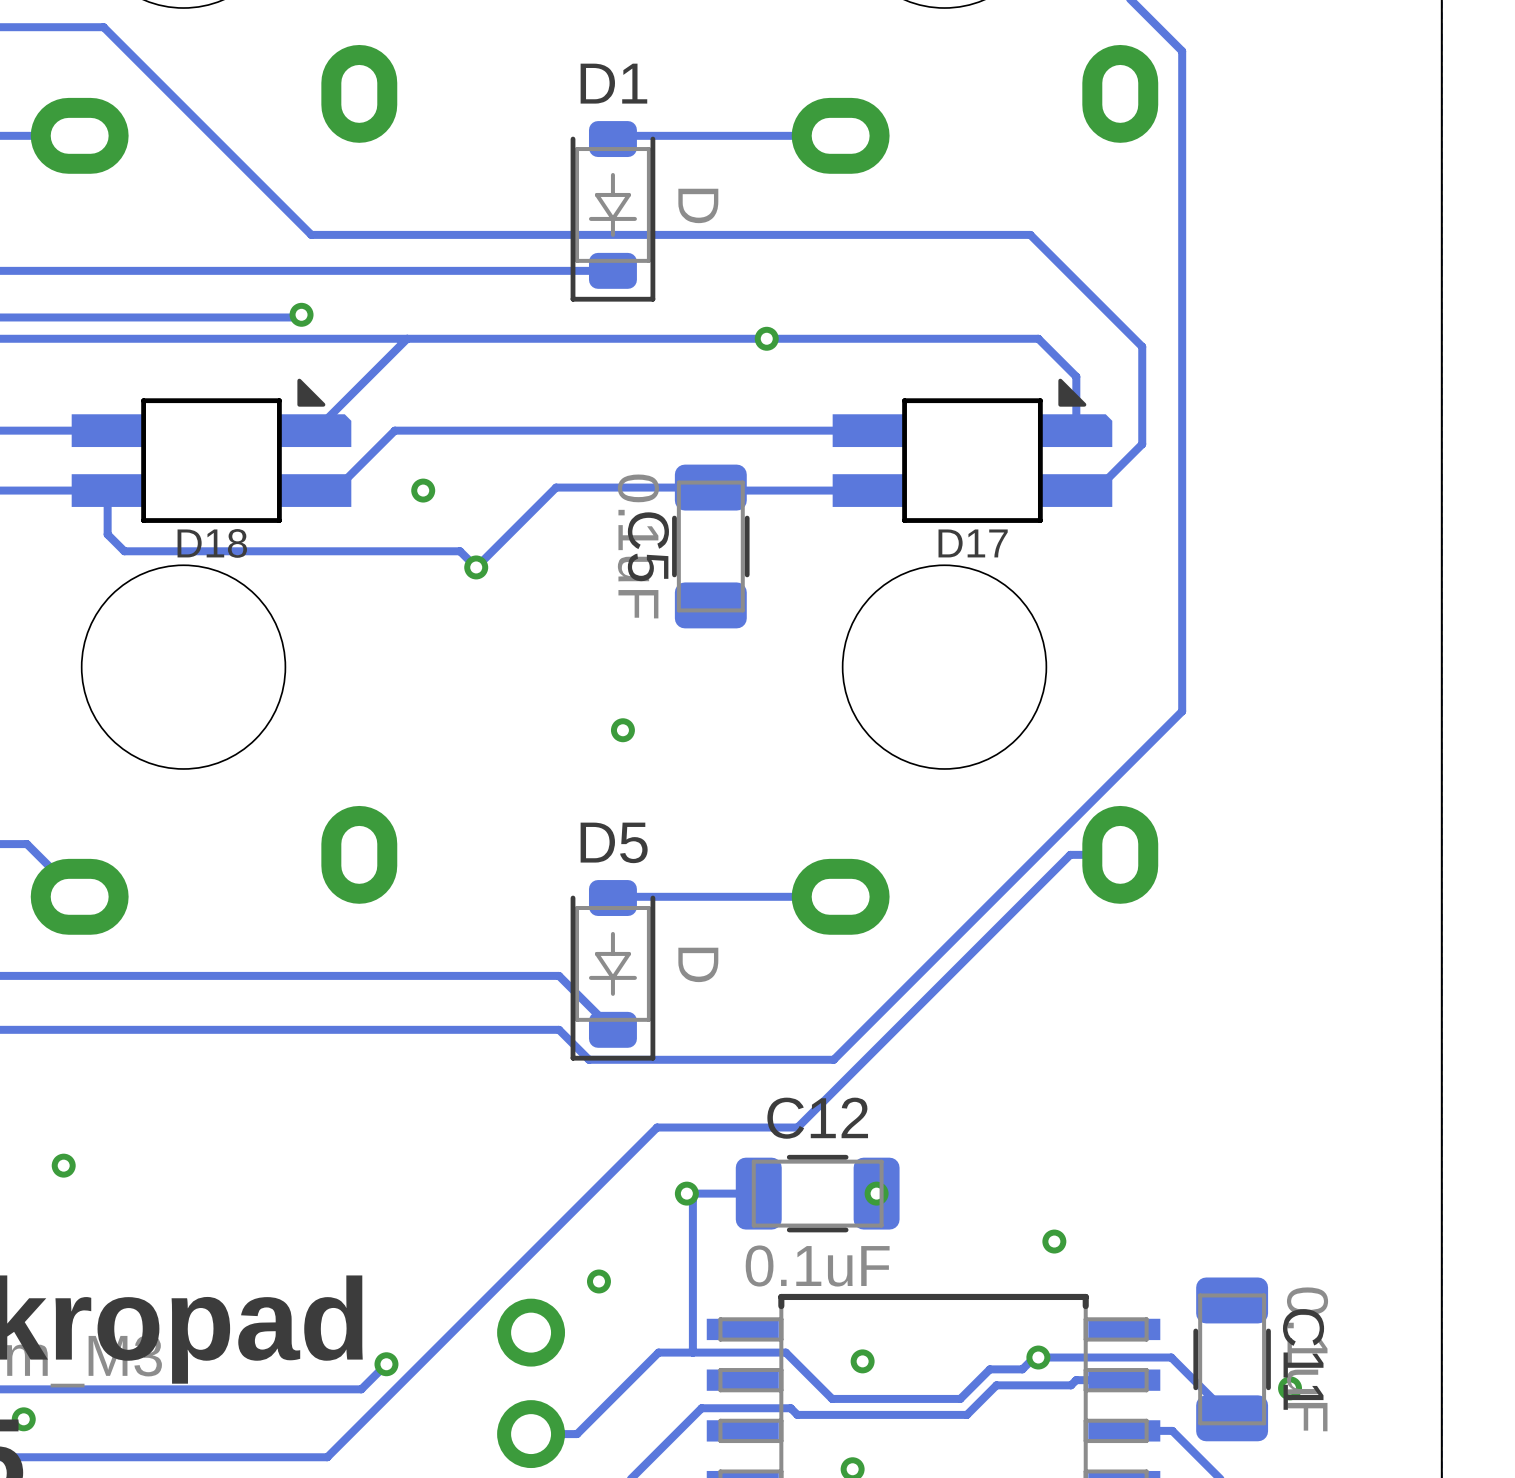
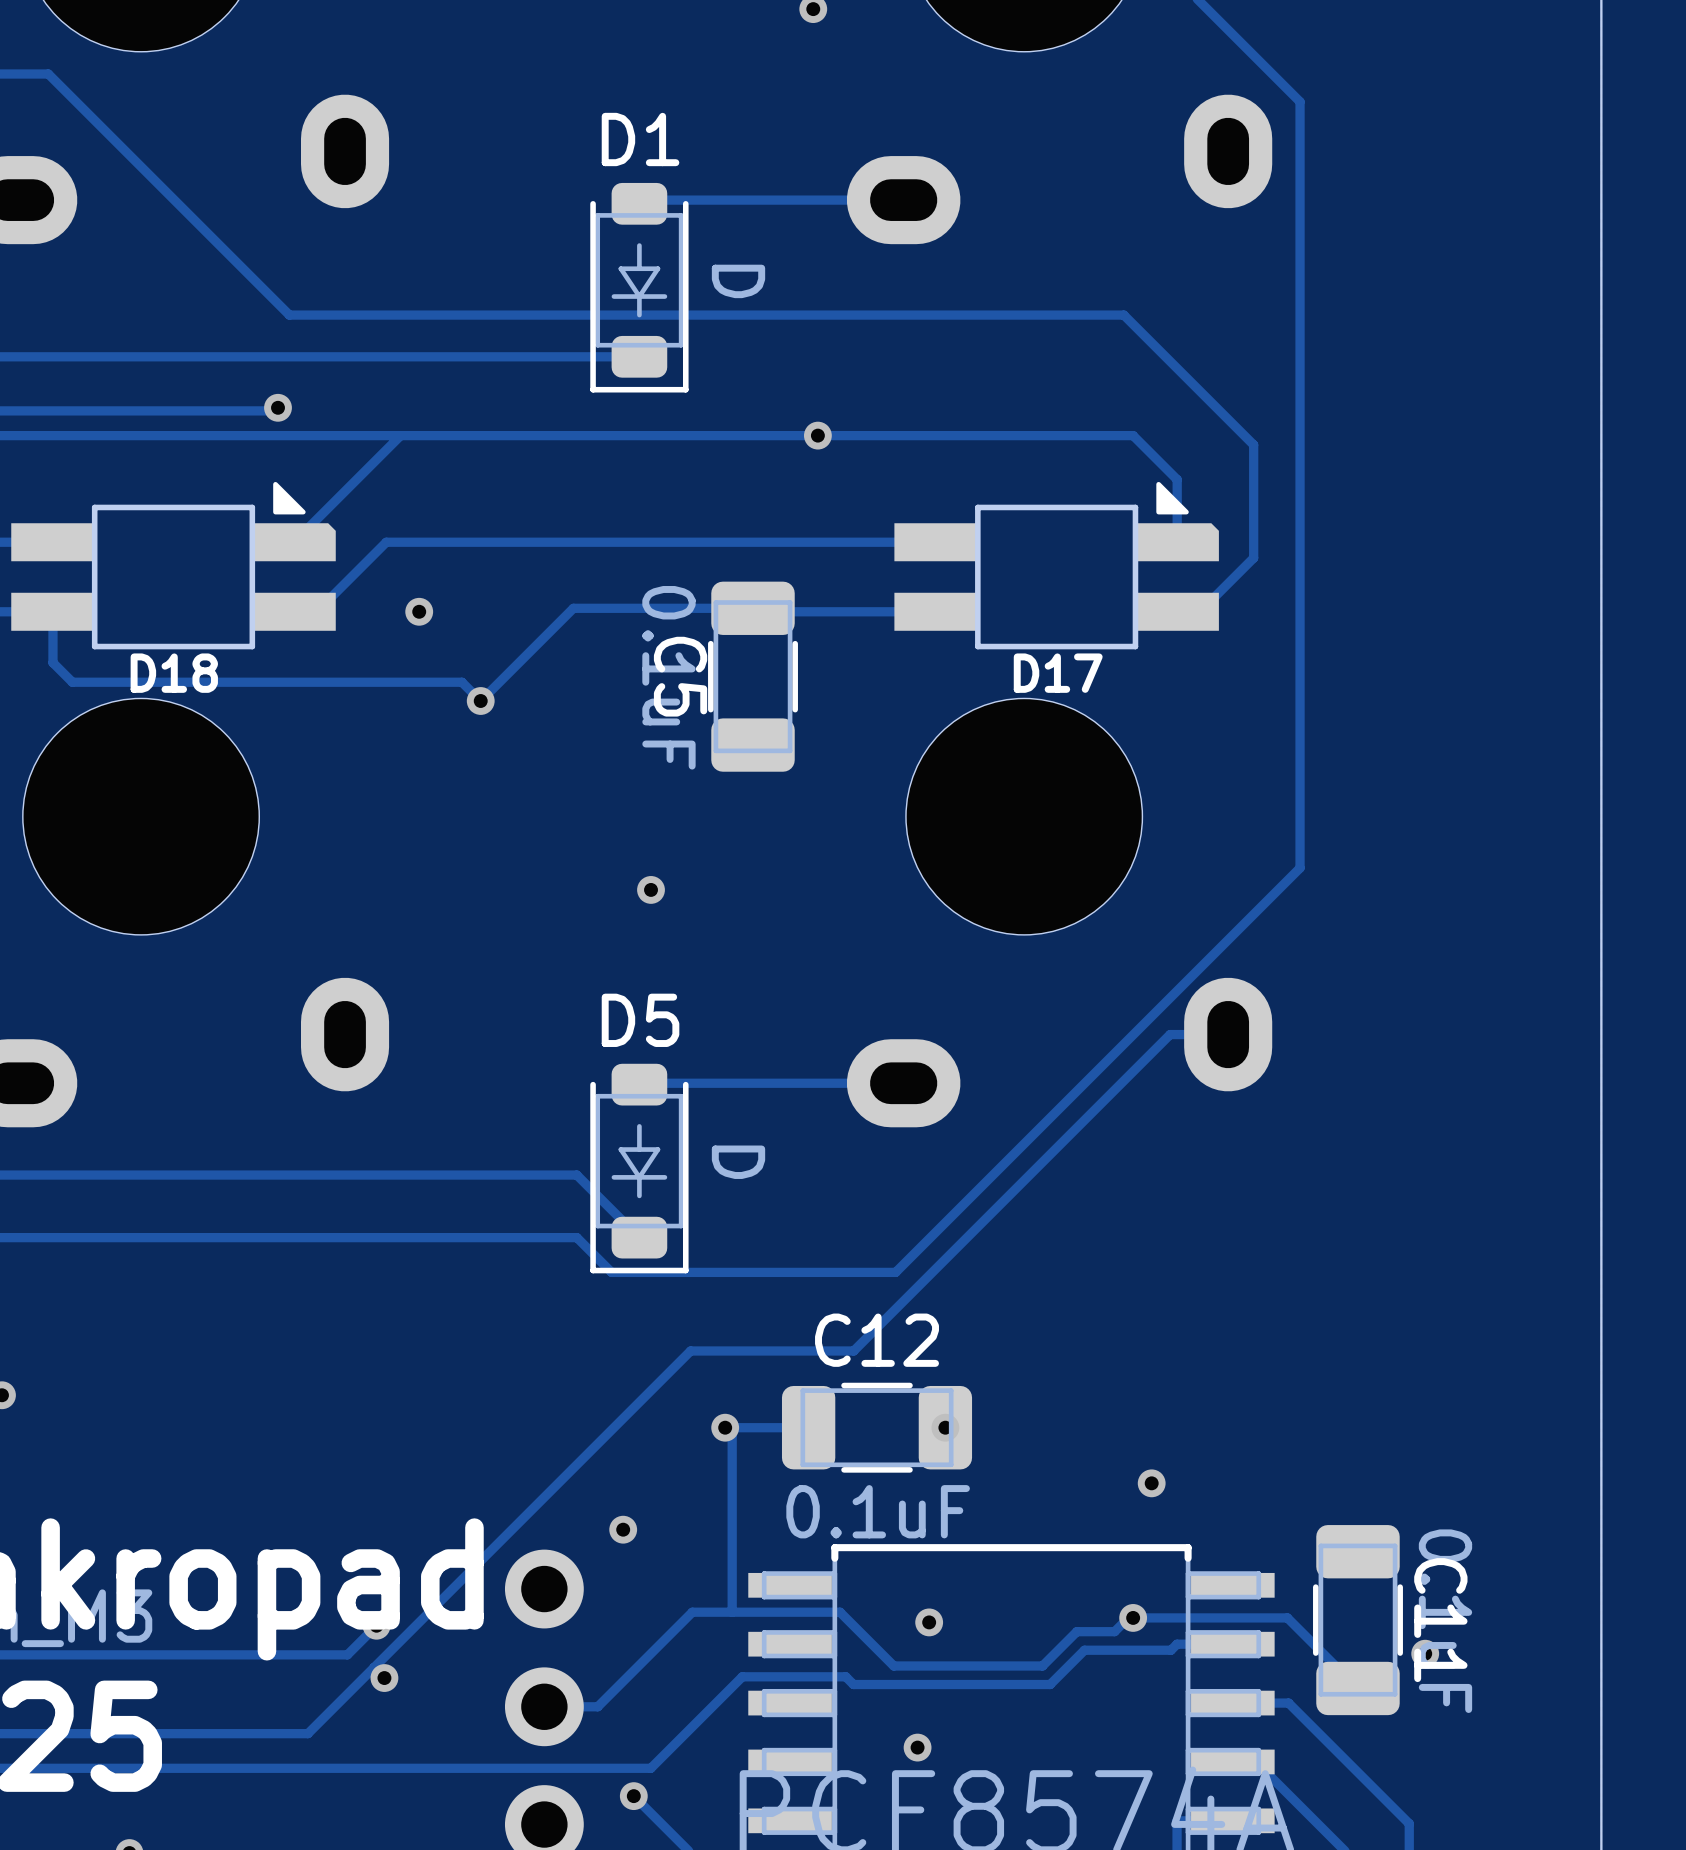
via: none -> (384, 1678)

